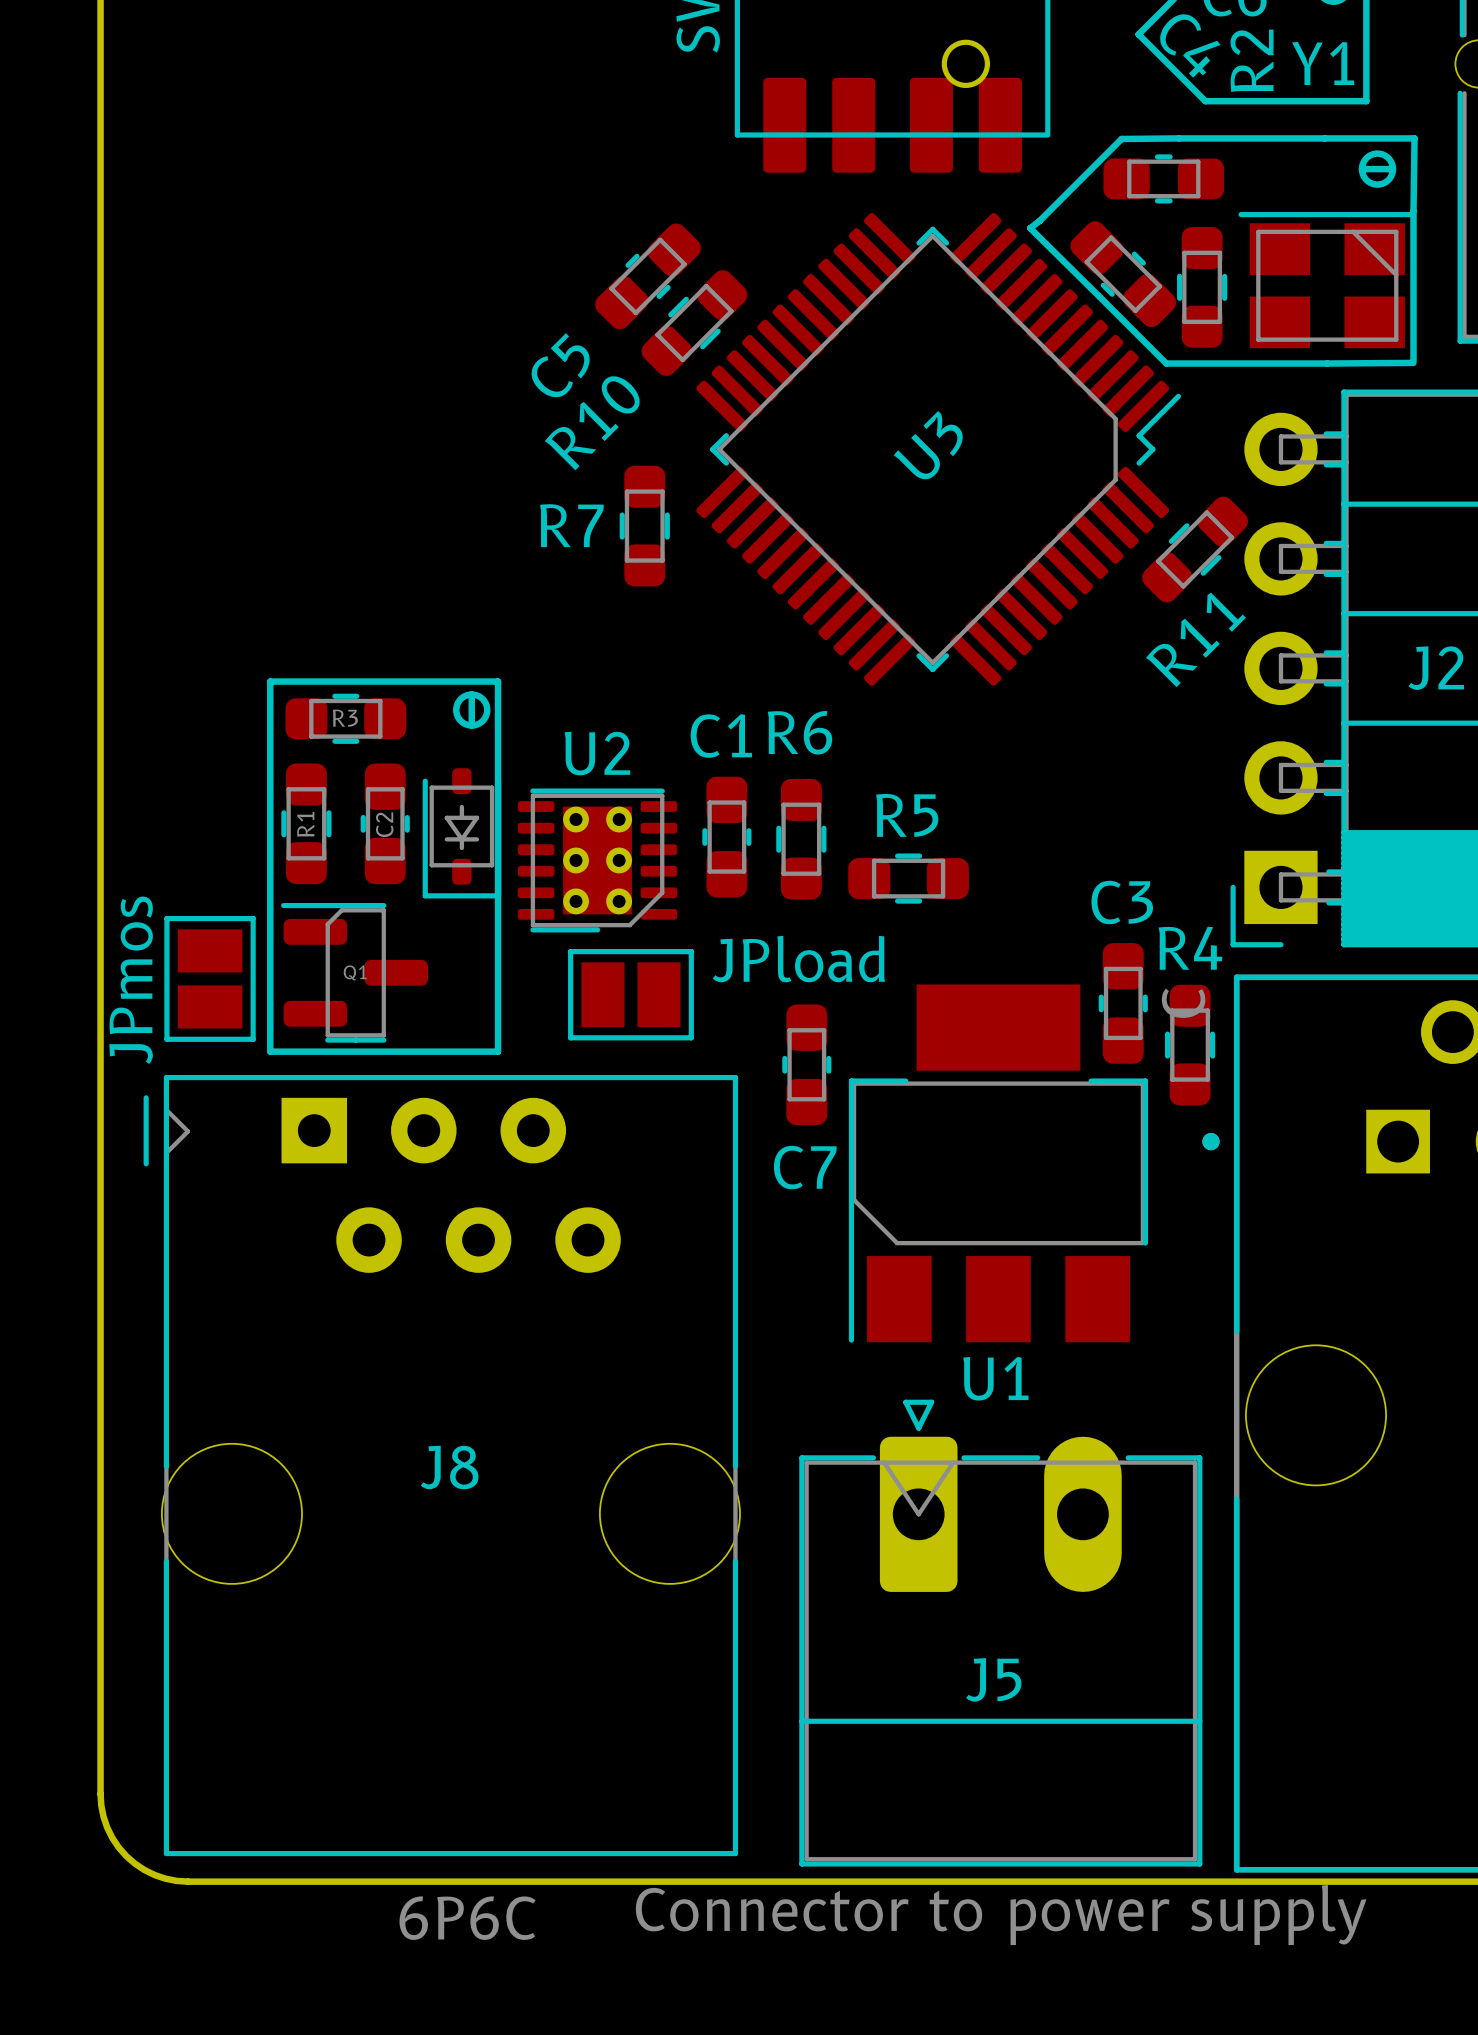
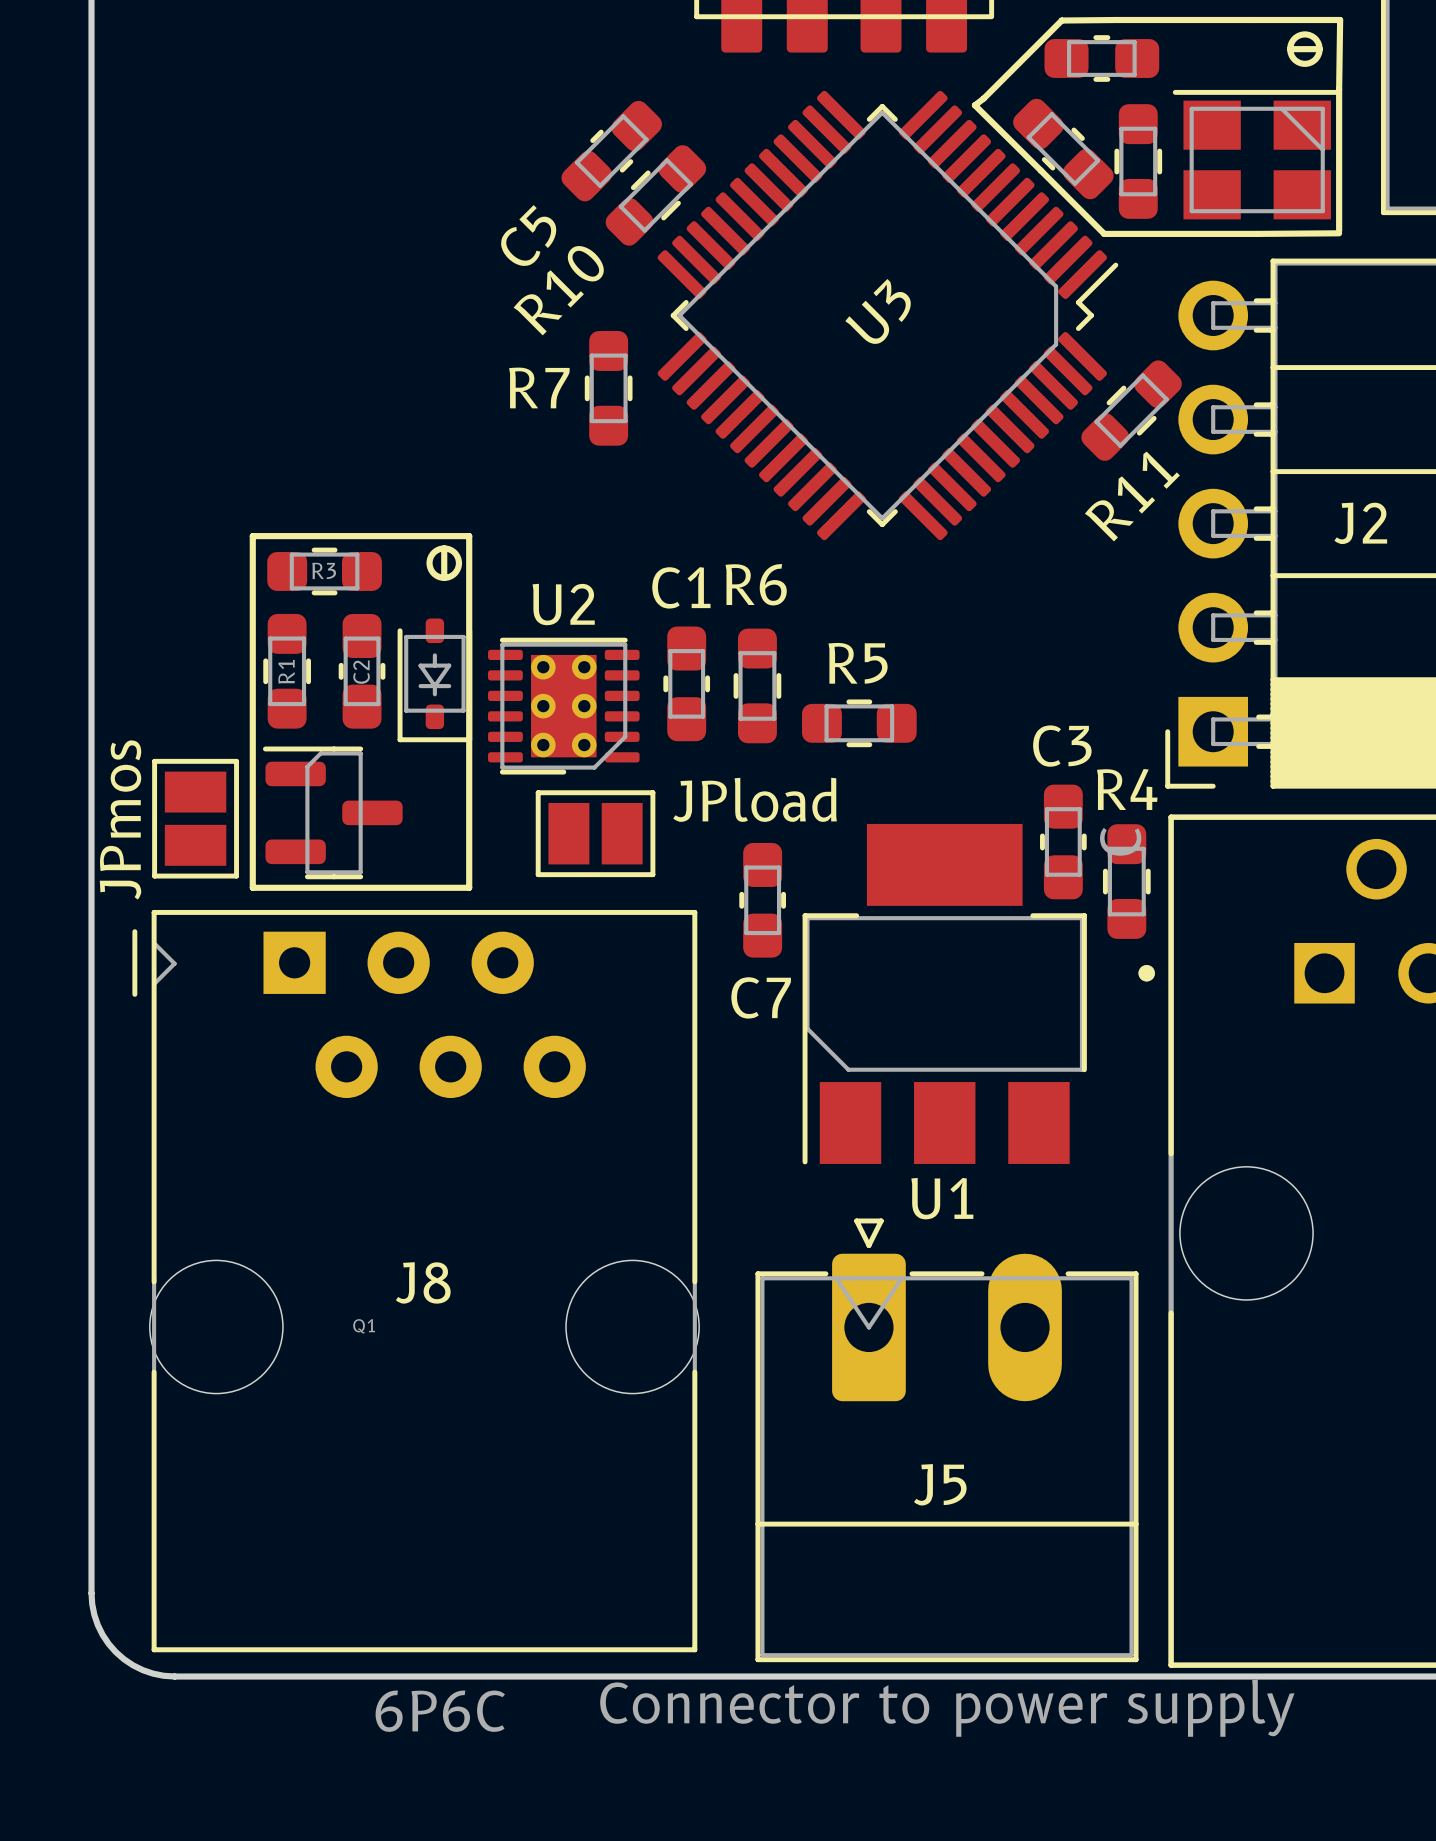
Q1 name position: Q1 (355, 972) -> Q1 (364, 1326)

